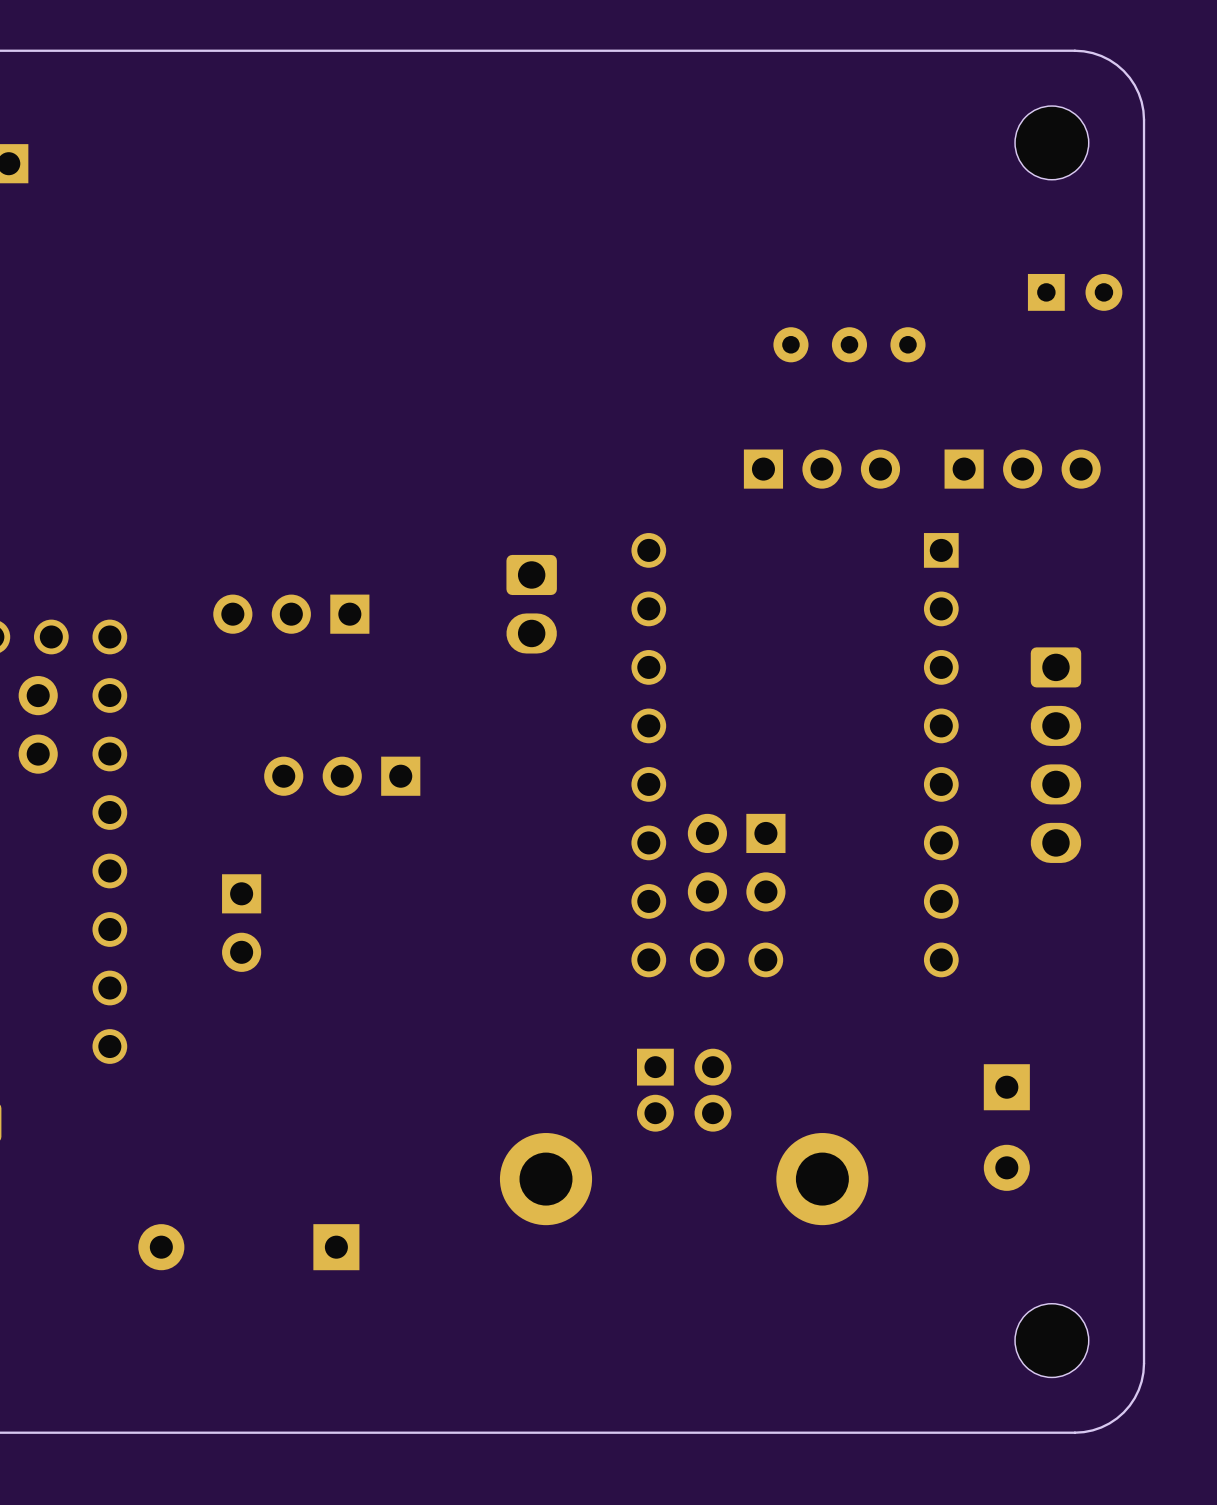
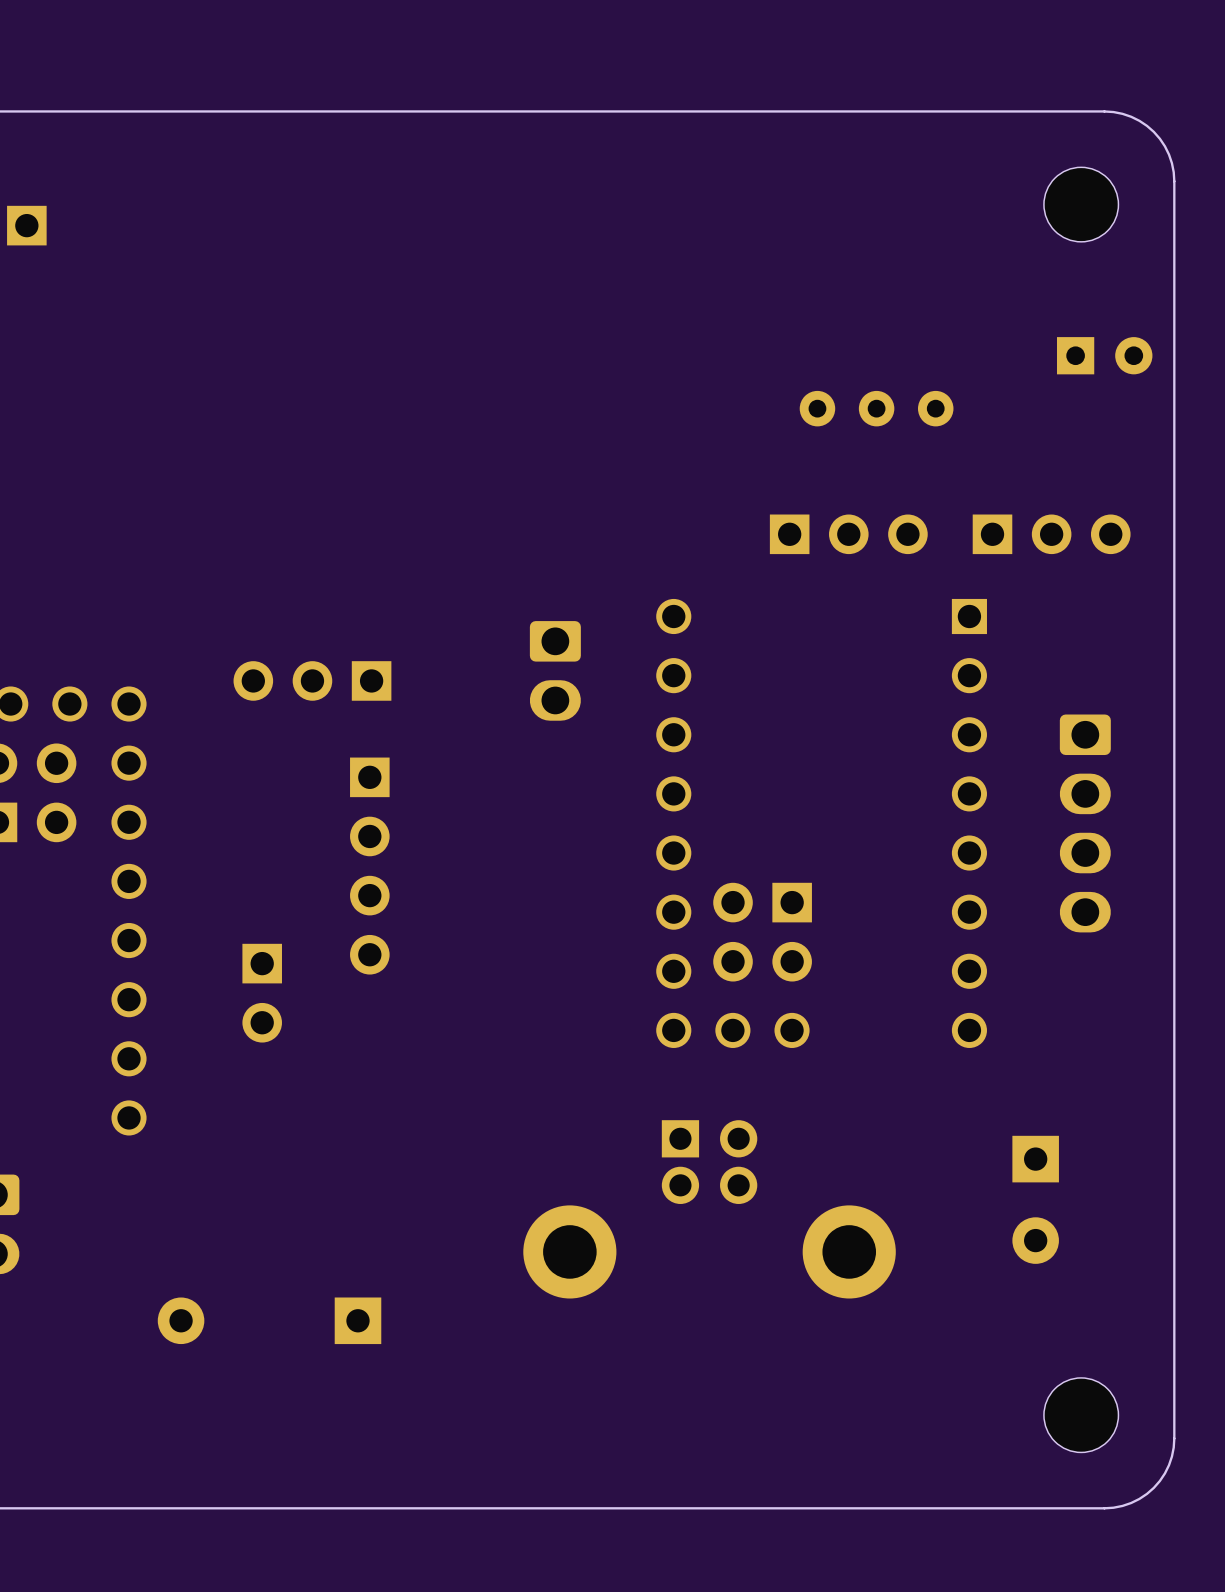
part footprint: [264, 756, 421, 796] -> [350, 757, 390, 975]

